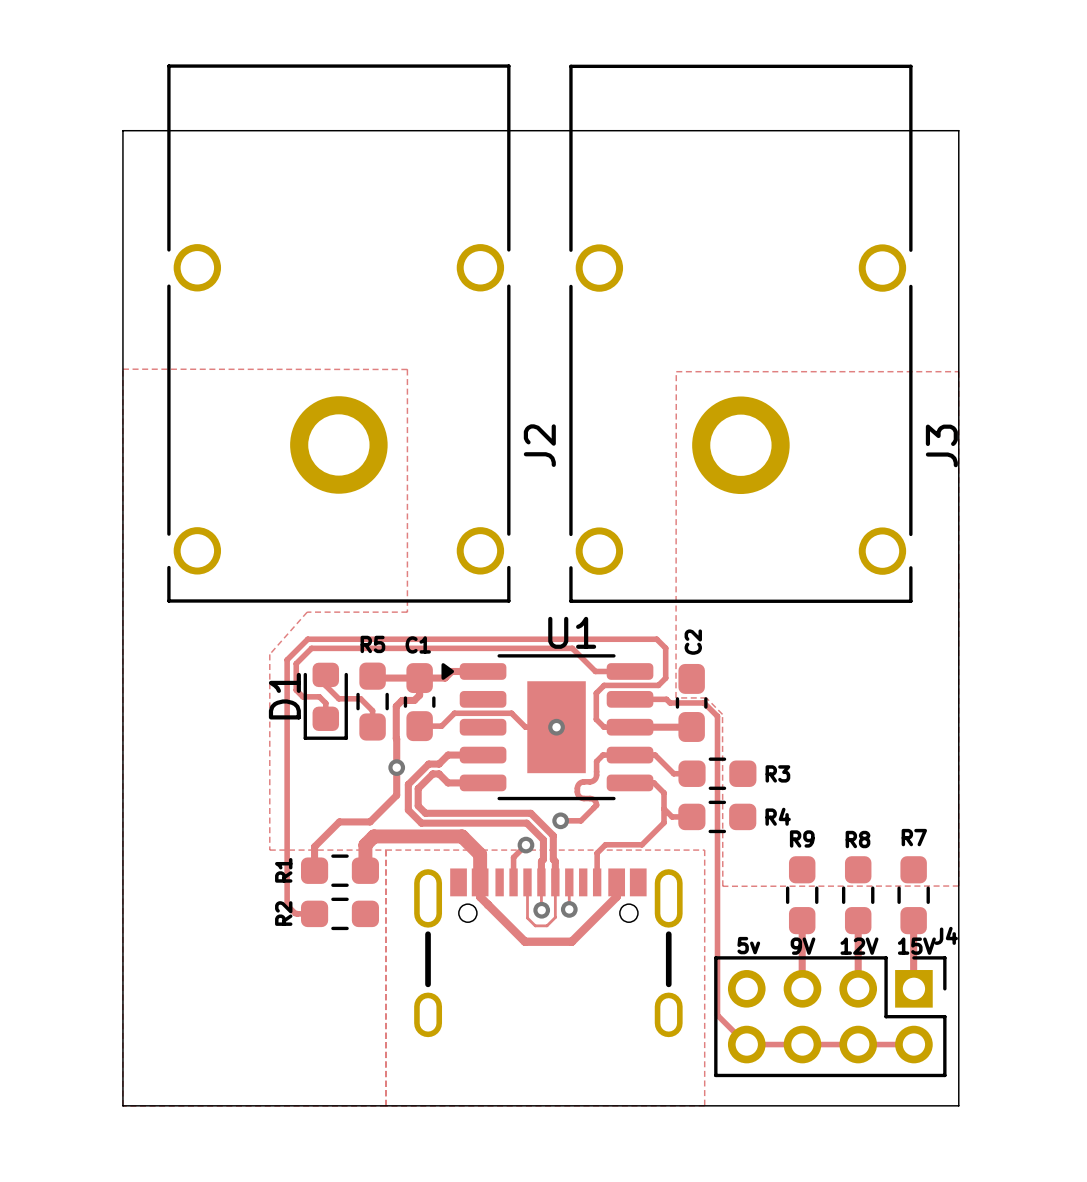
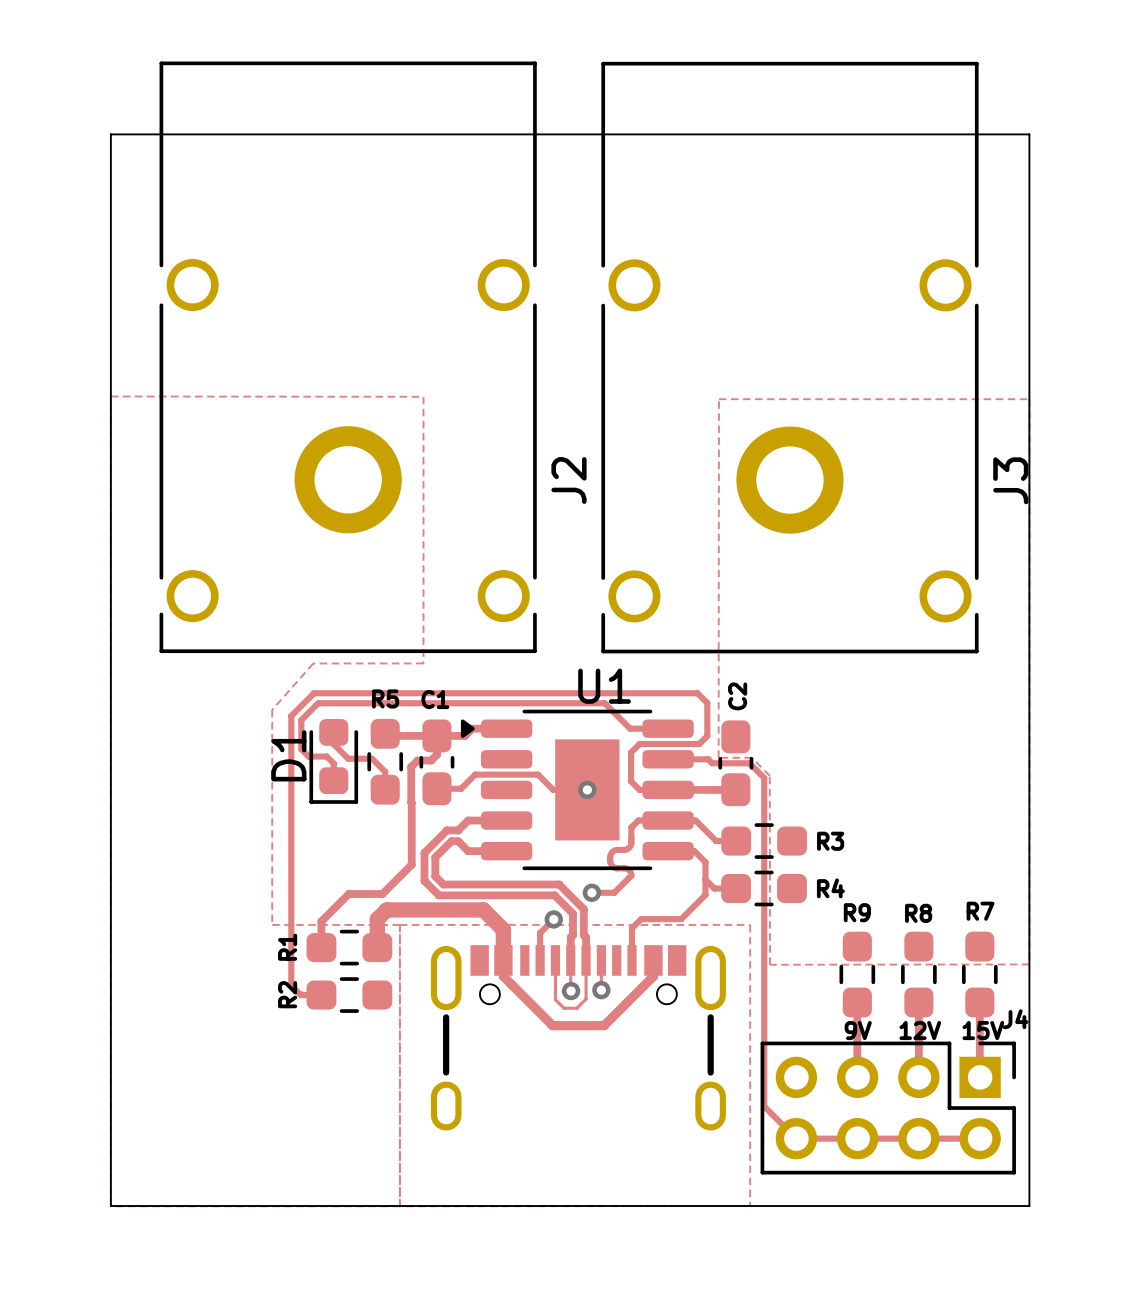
via: (396, 767) -> none
text: 5v (748, 945) -> none

